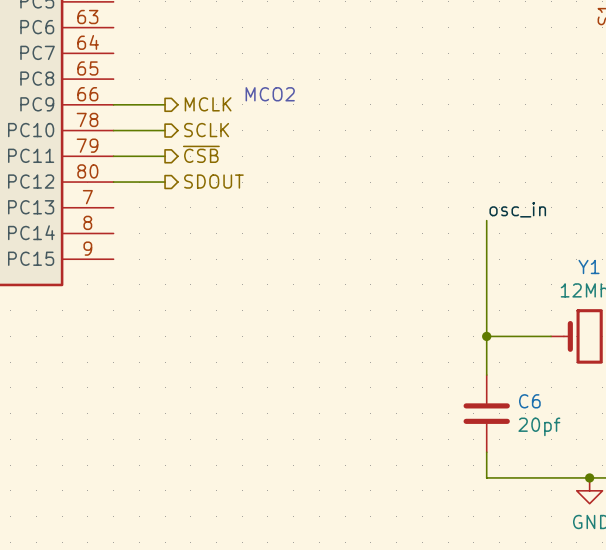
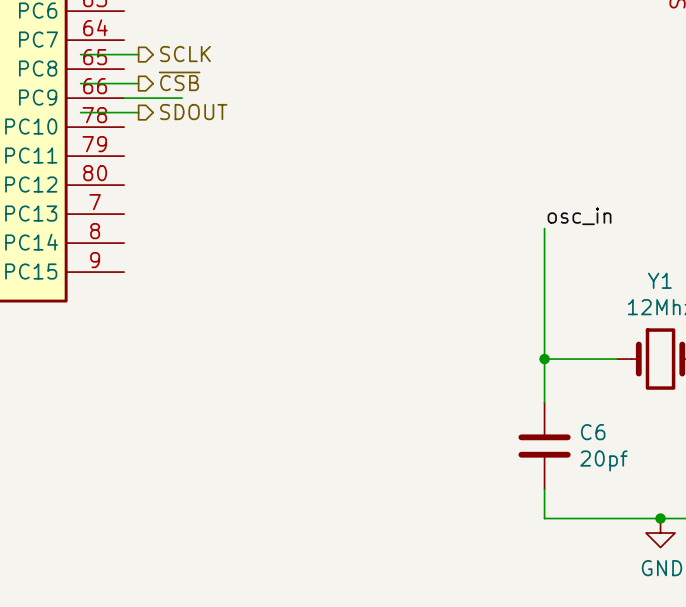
text: MCO2 (270, 94) -> none
hierarchical label: MCLK (208, 104) -> none
wire: (113, 130) (165, 130) -> (80, 54) (138, 54)
hierarchical label position: SCLK (206, 130) -> SCLK (185, 54)
hierarchical label position: ~{CSB} (201, 154) -> ~{CSB} (179, 81)
wire: (113, 156) (165, 156) -> (80, 83) (138, 83)
hierarchical label position: SDOUT (213, 181) -> SDOUT (193, 112)
wire: (113, 182) (165, 182) -> (80, 112) (138, 112)

